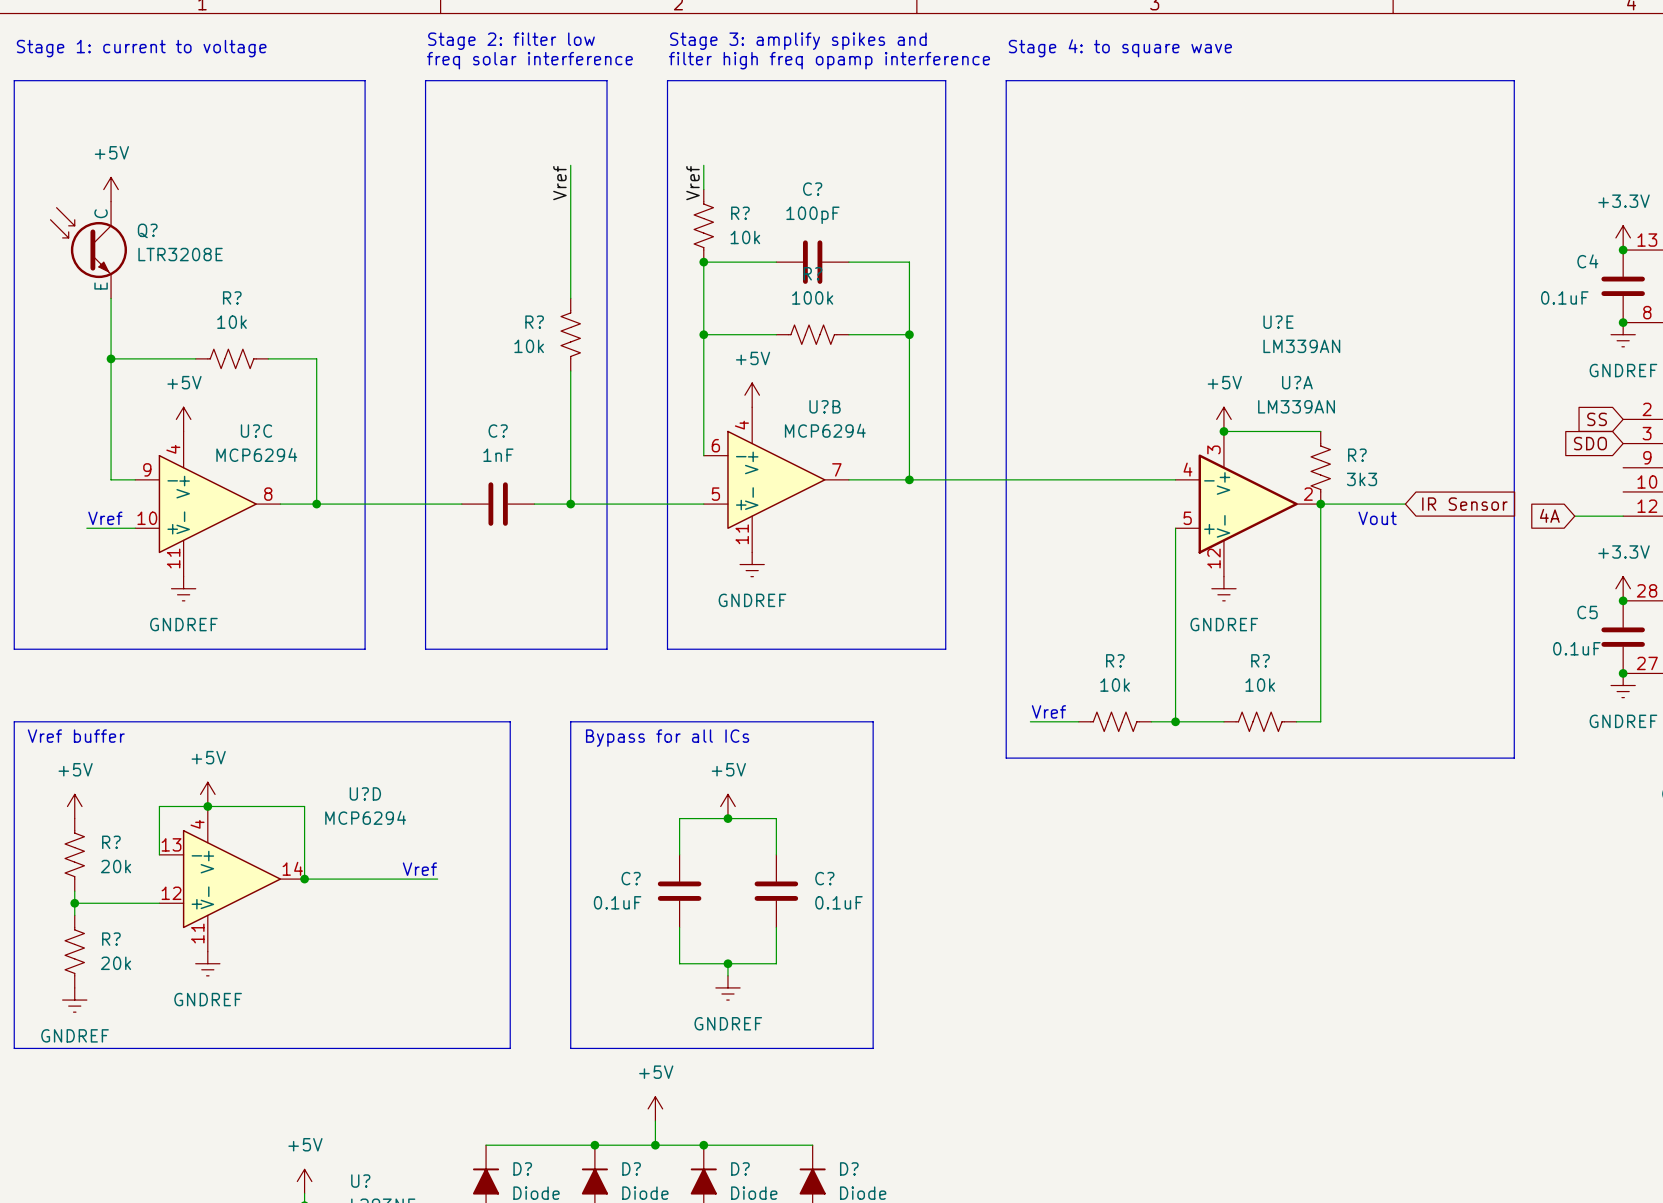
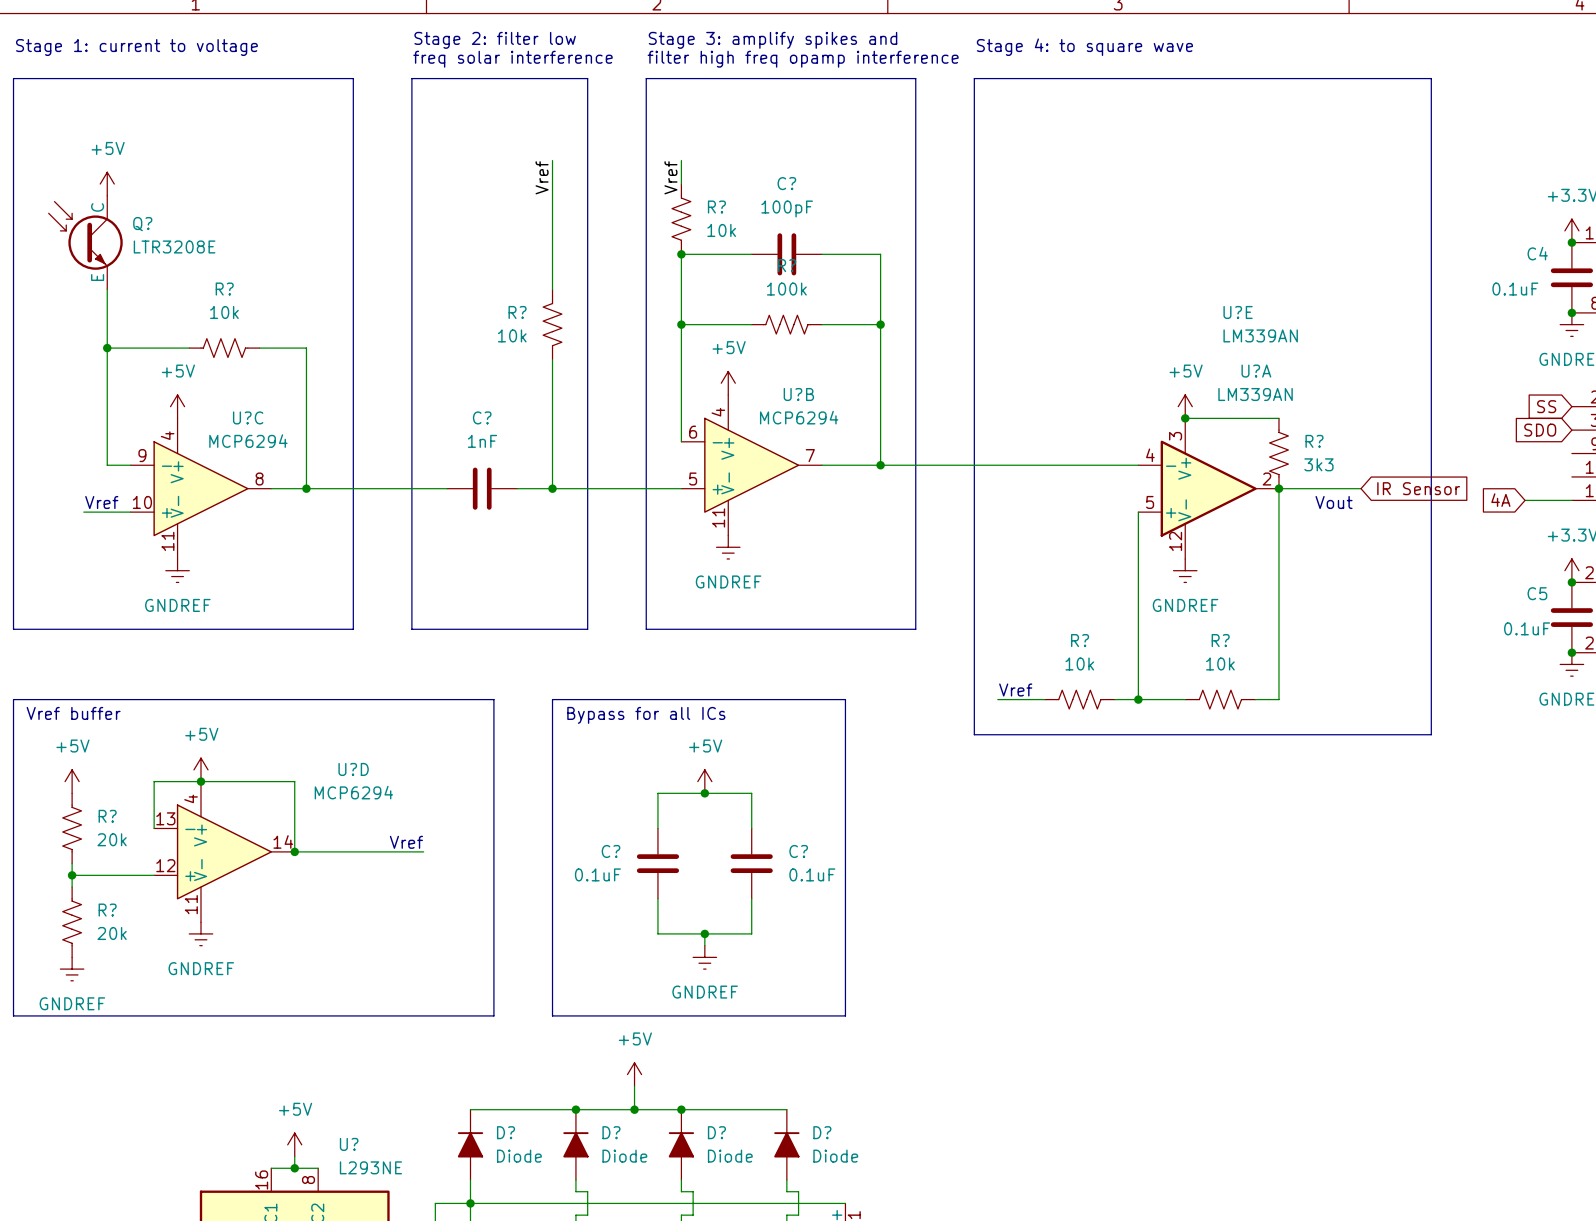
line: (1477, 80) (1514, 80) (1514, 758) (1477, 758) -> (1431, 78) (1431, 734)

